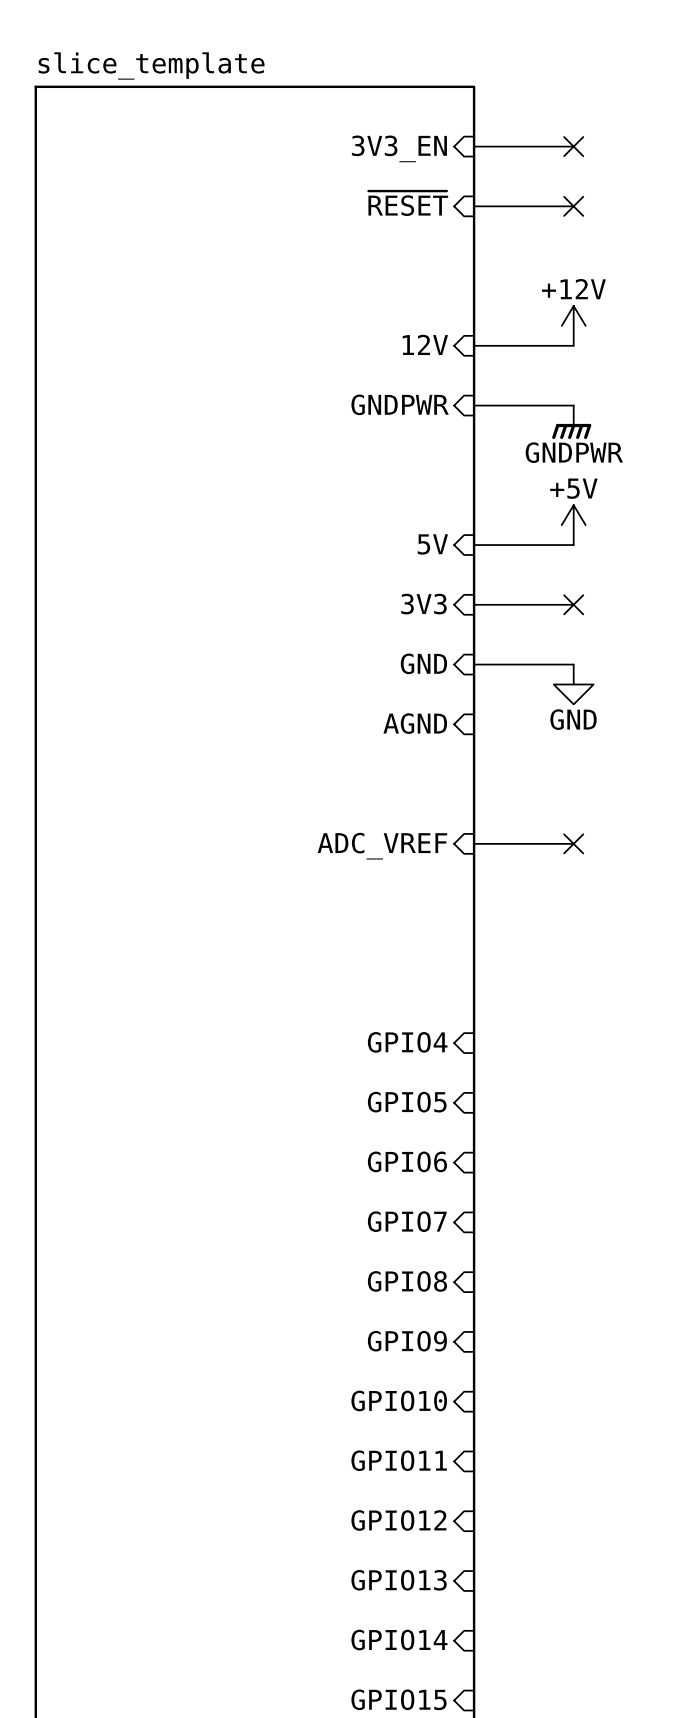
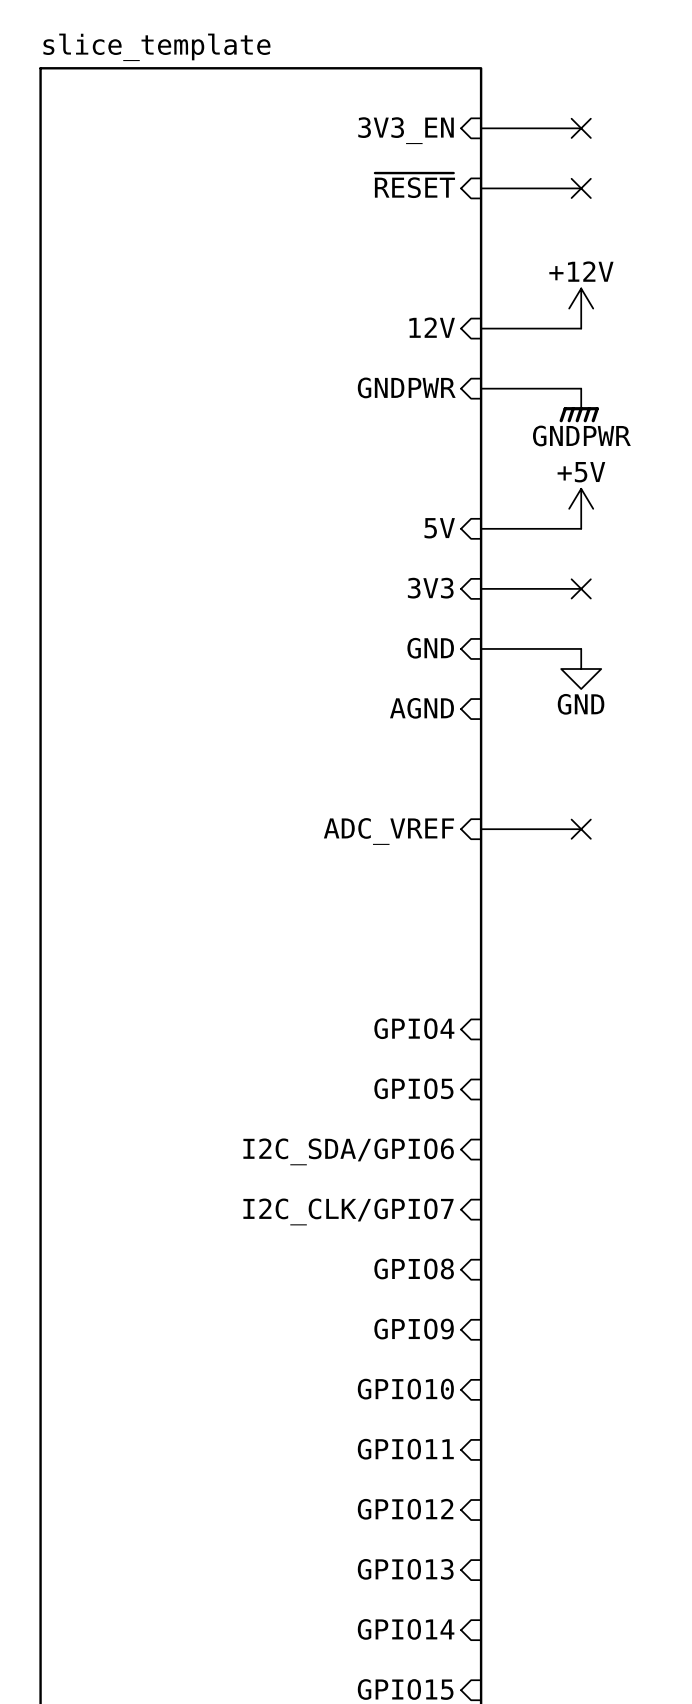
sheet pin: GPIO6 (407, 1161) -> I2C_SDA/GPIO6 (348, 1151)
sheet pin: GPIO7 (407, 1221) -> I2C_CLK/GPIO7 (348, 1211)

